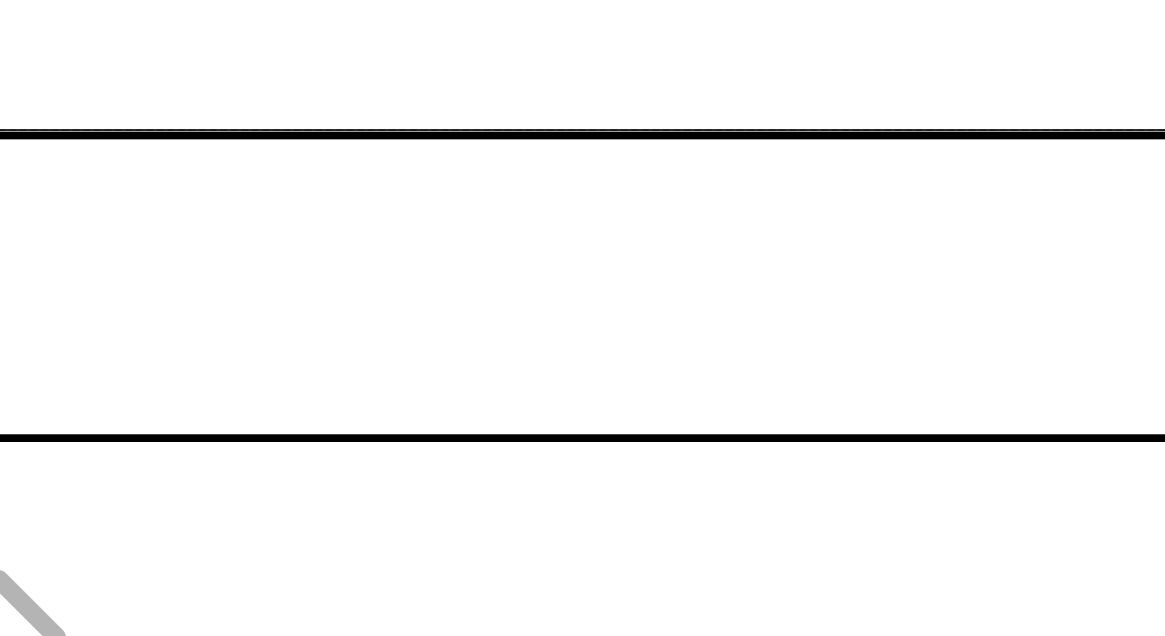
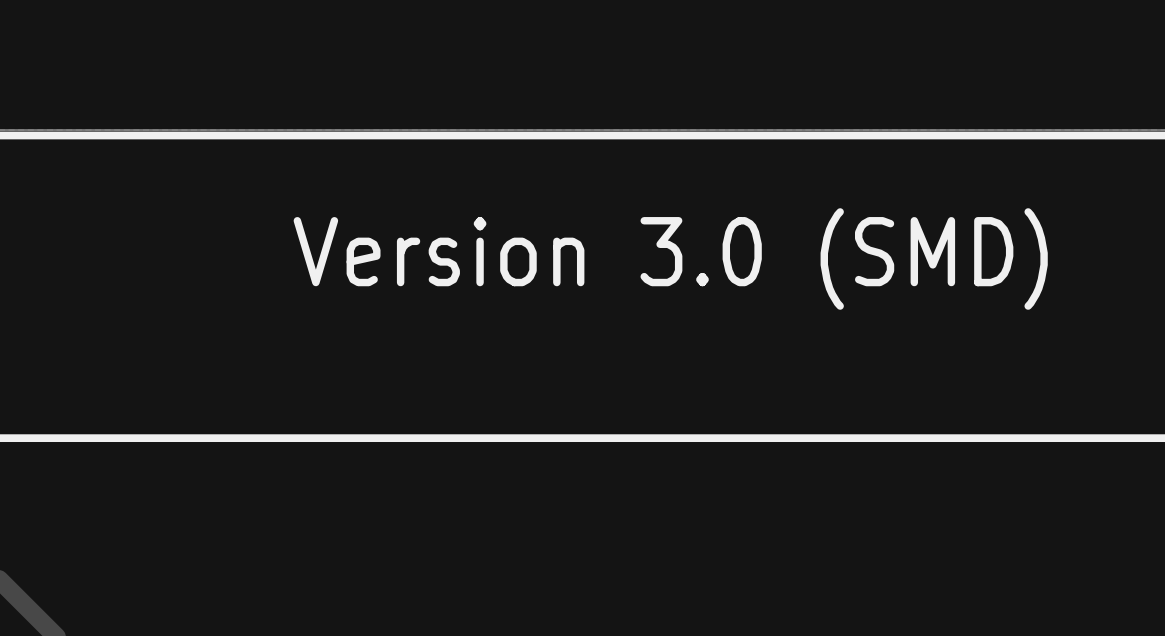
text: none -> Version 3.0 (SMD) (670, 258)

